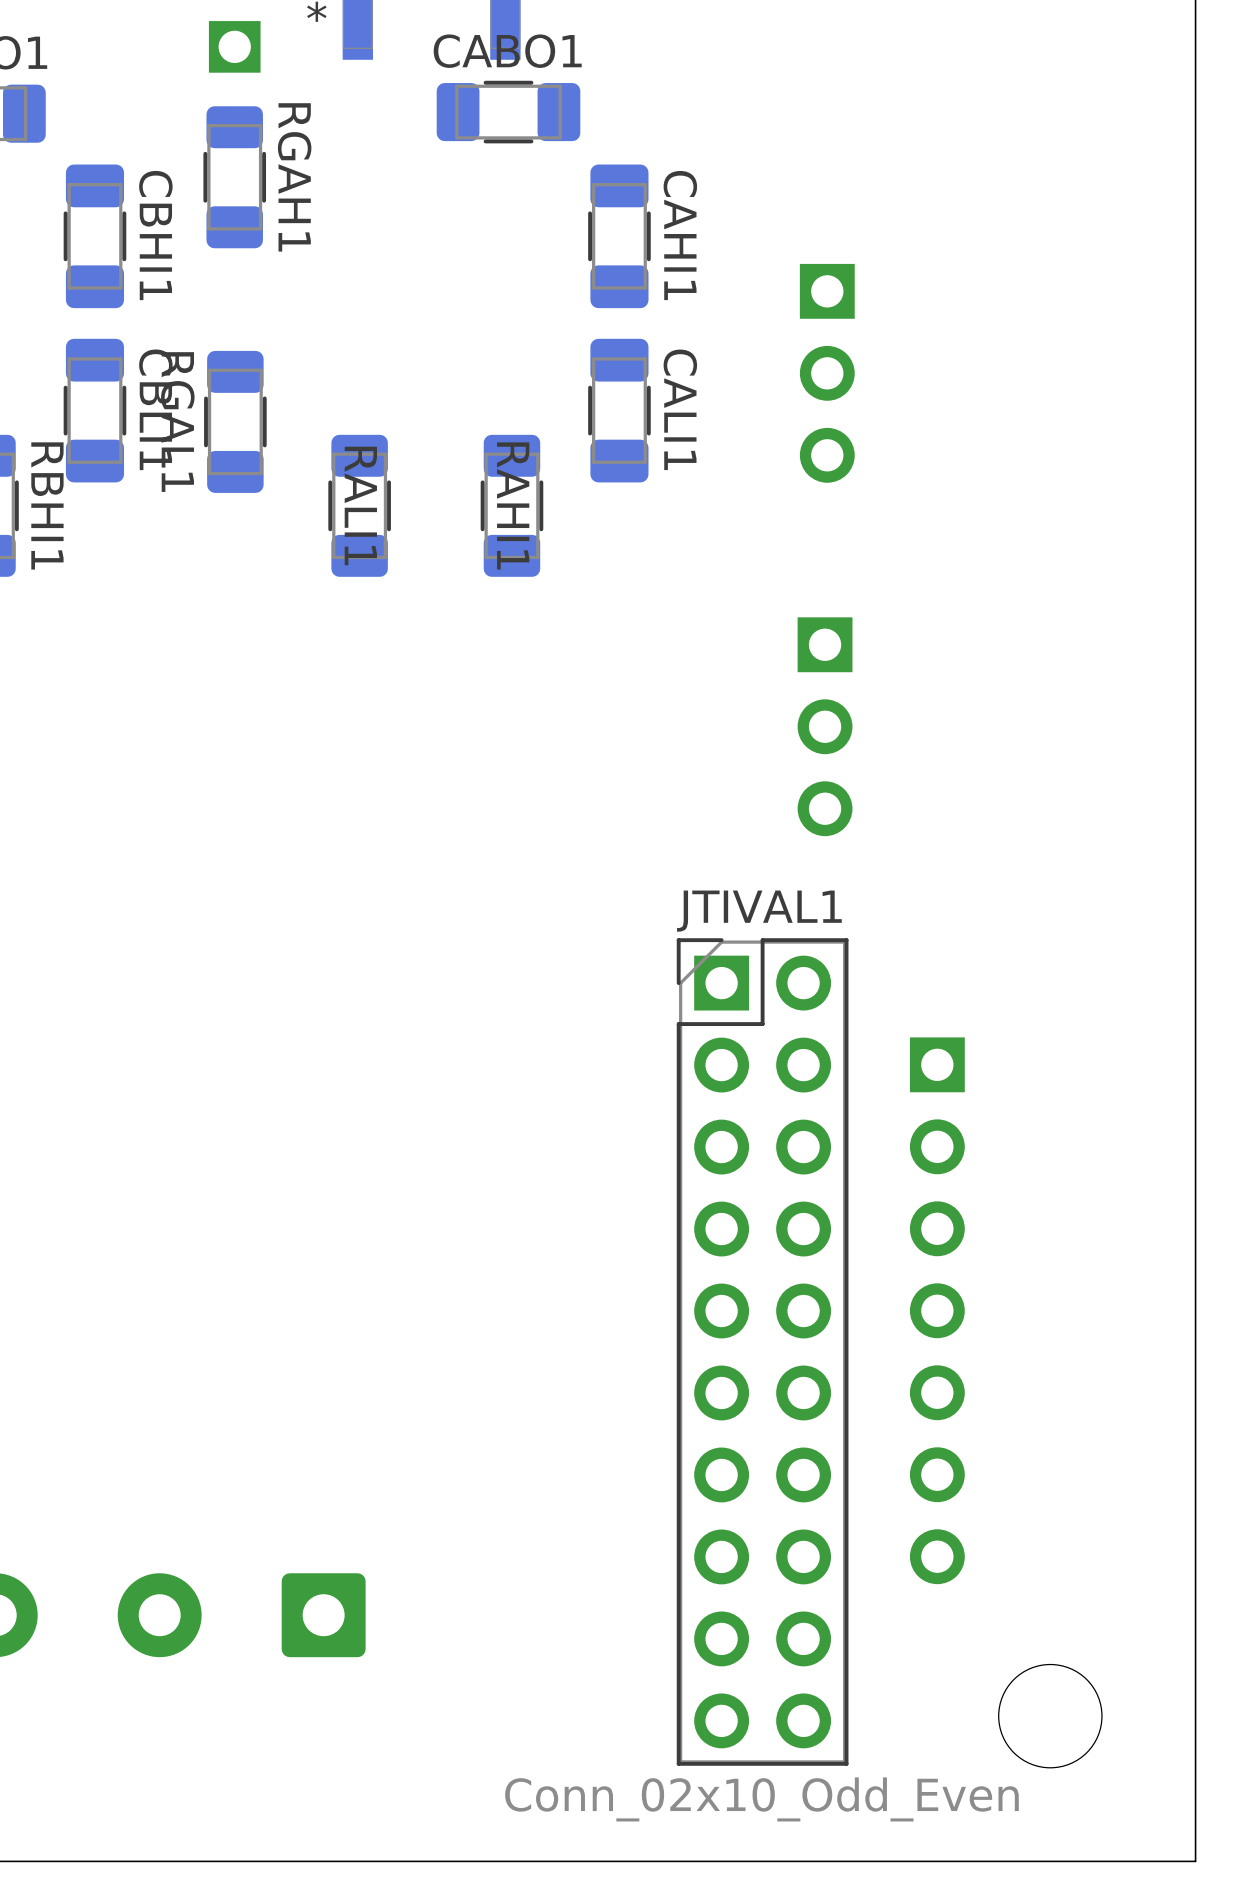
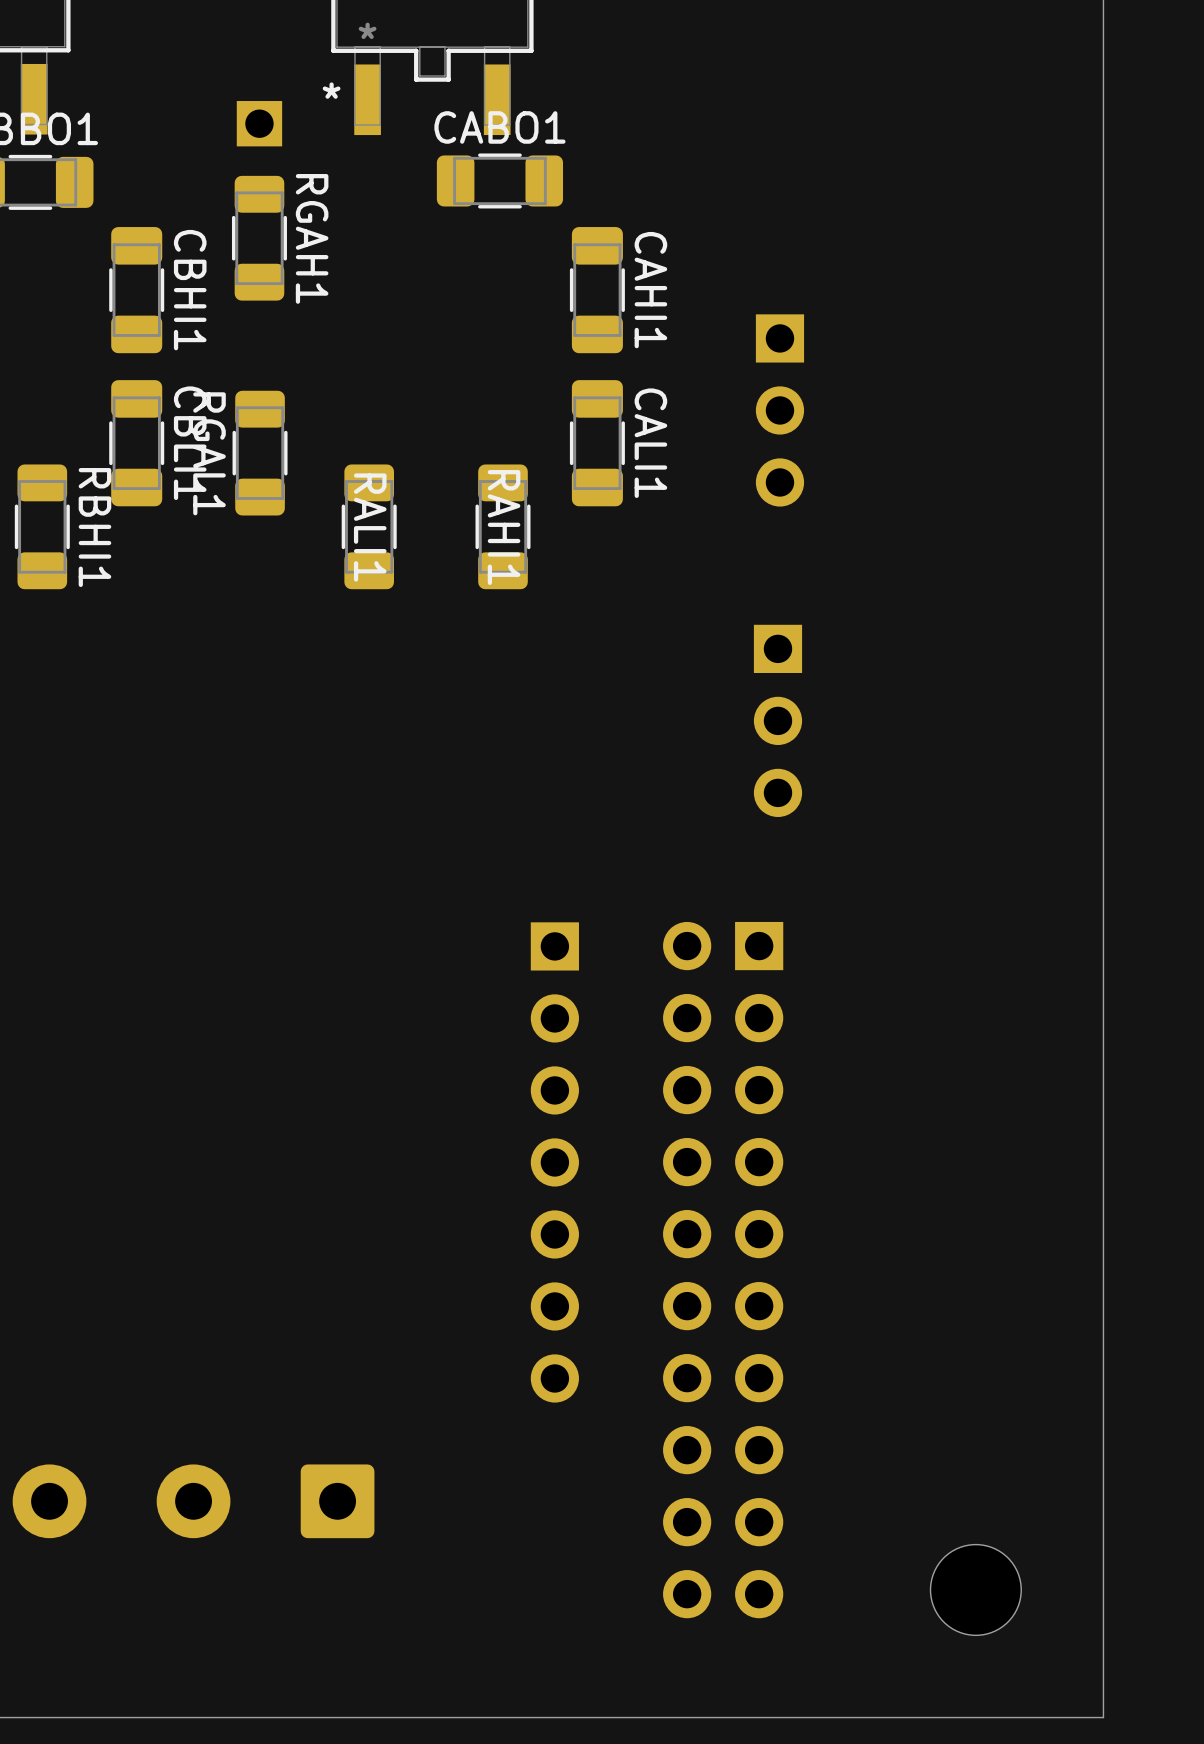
part position: (937, 1310) -> (554, 1162)
JTIVAL1 side: bottom (762, 1351) -> top (723, 1270)

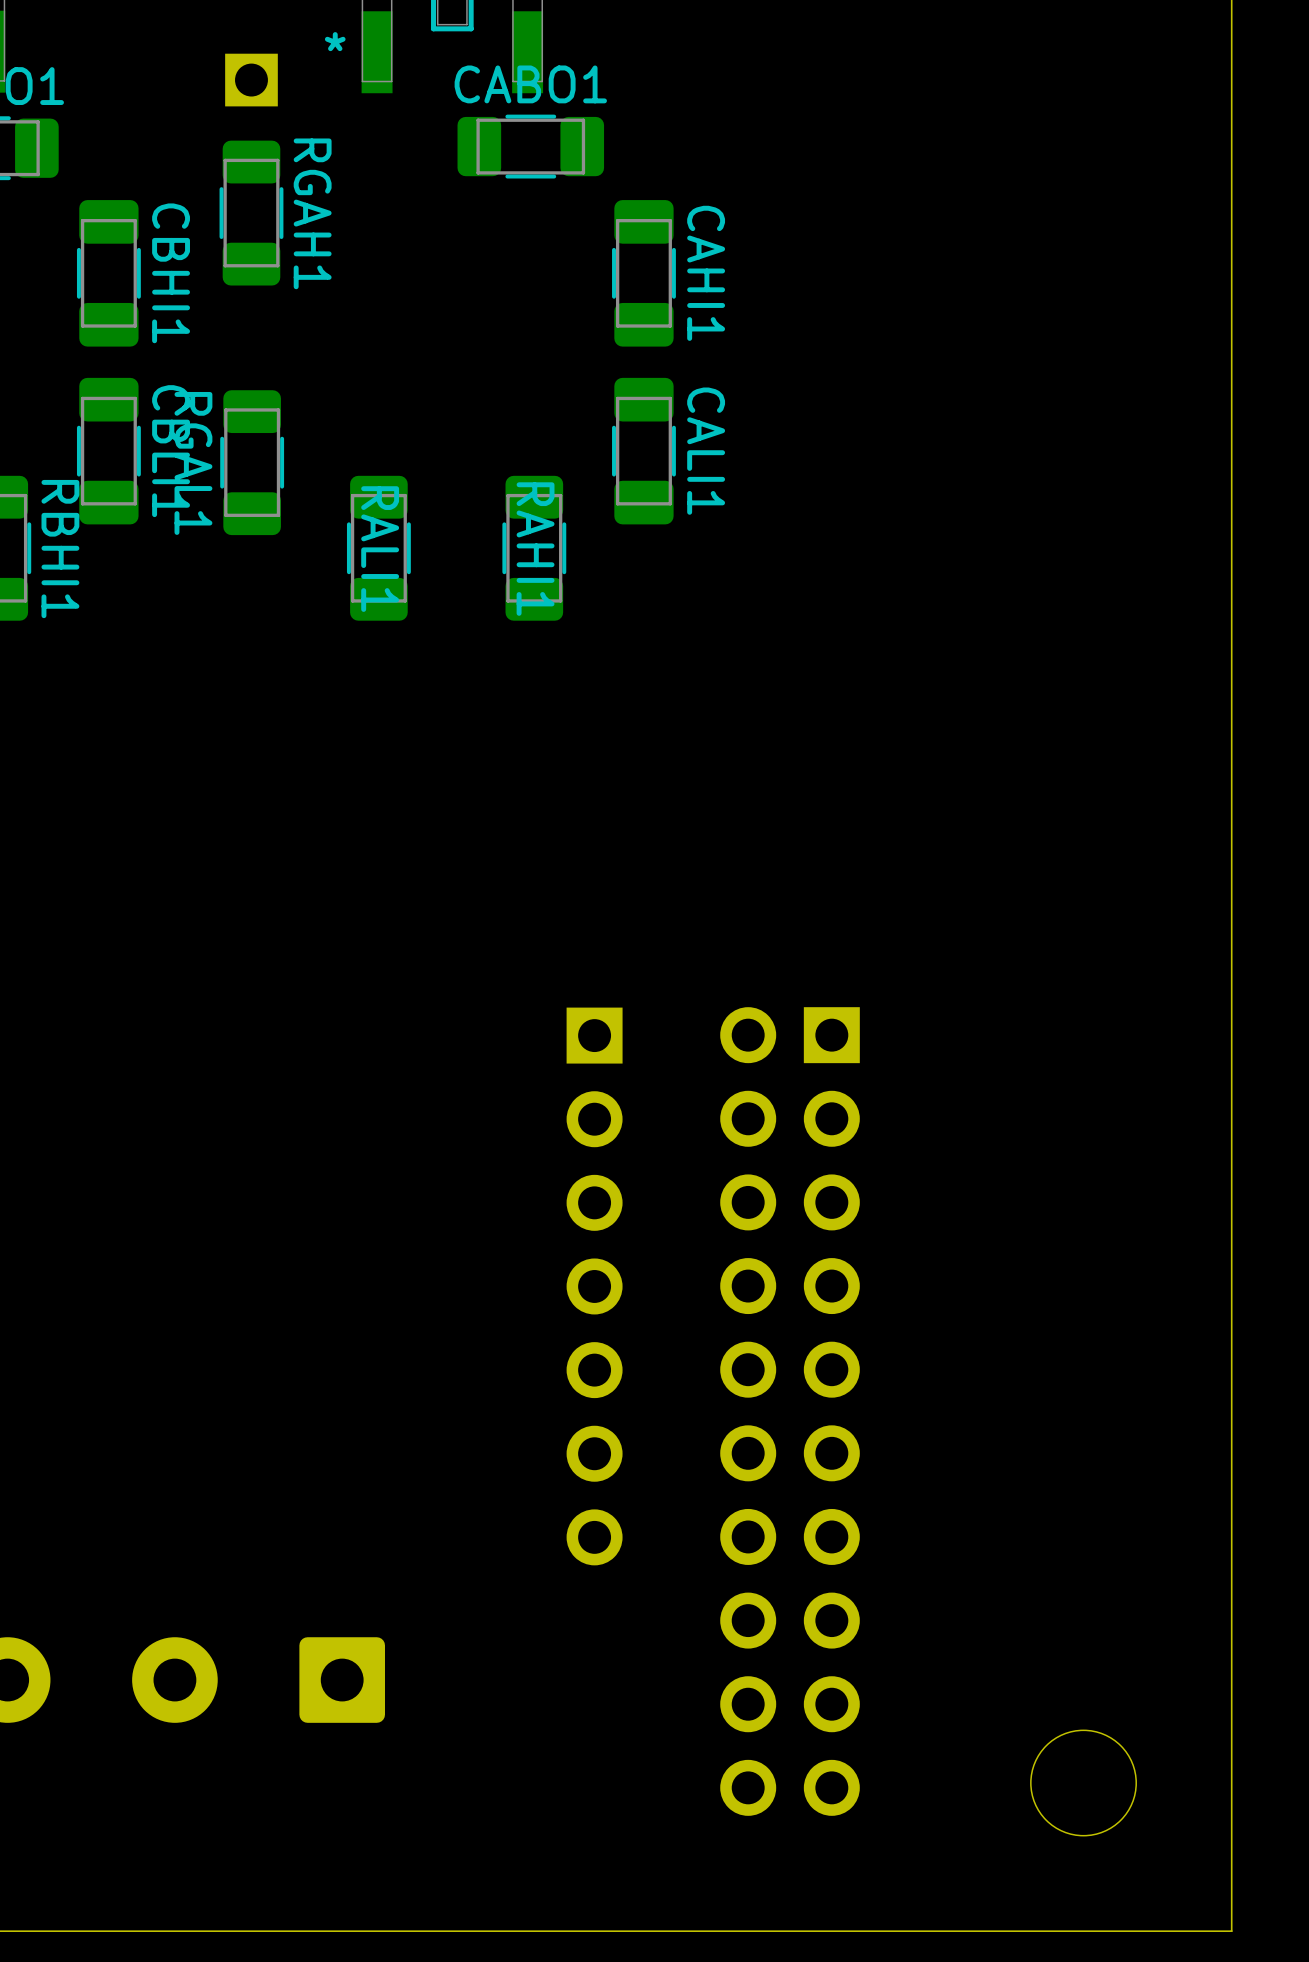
part: (779, 410) -> none
part: (777, 720) -> none

